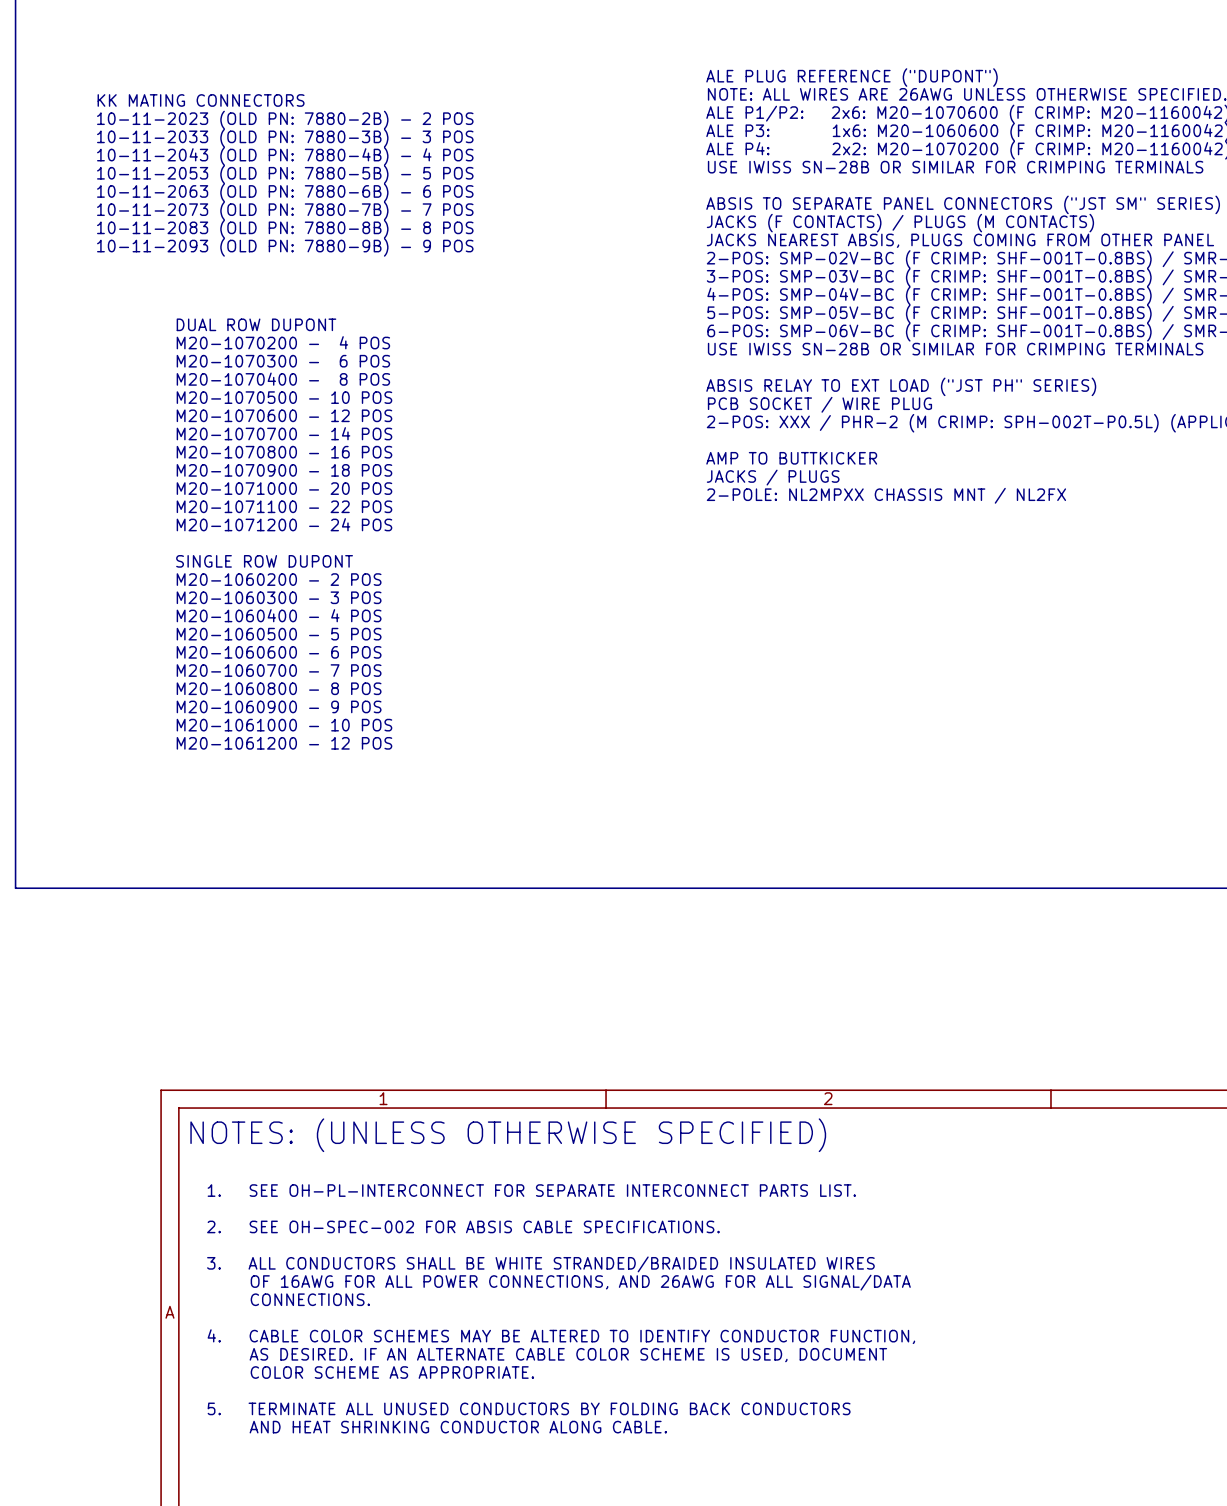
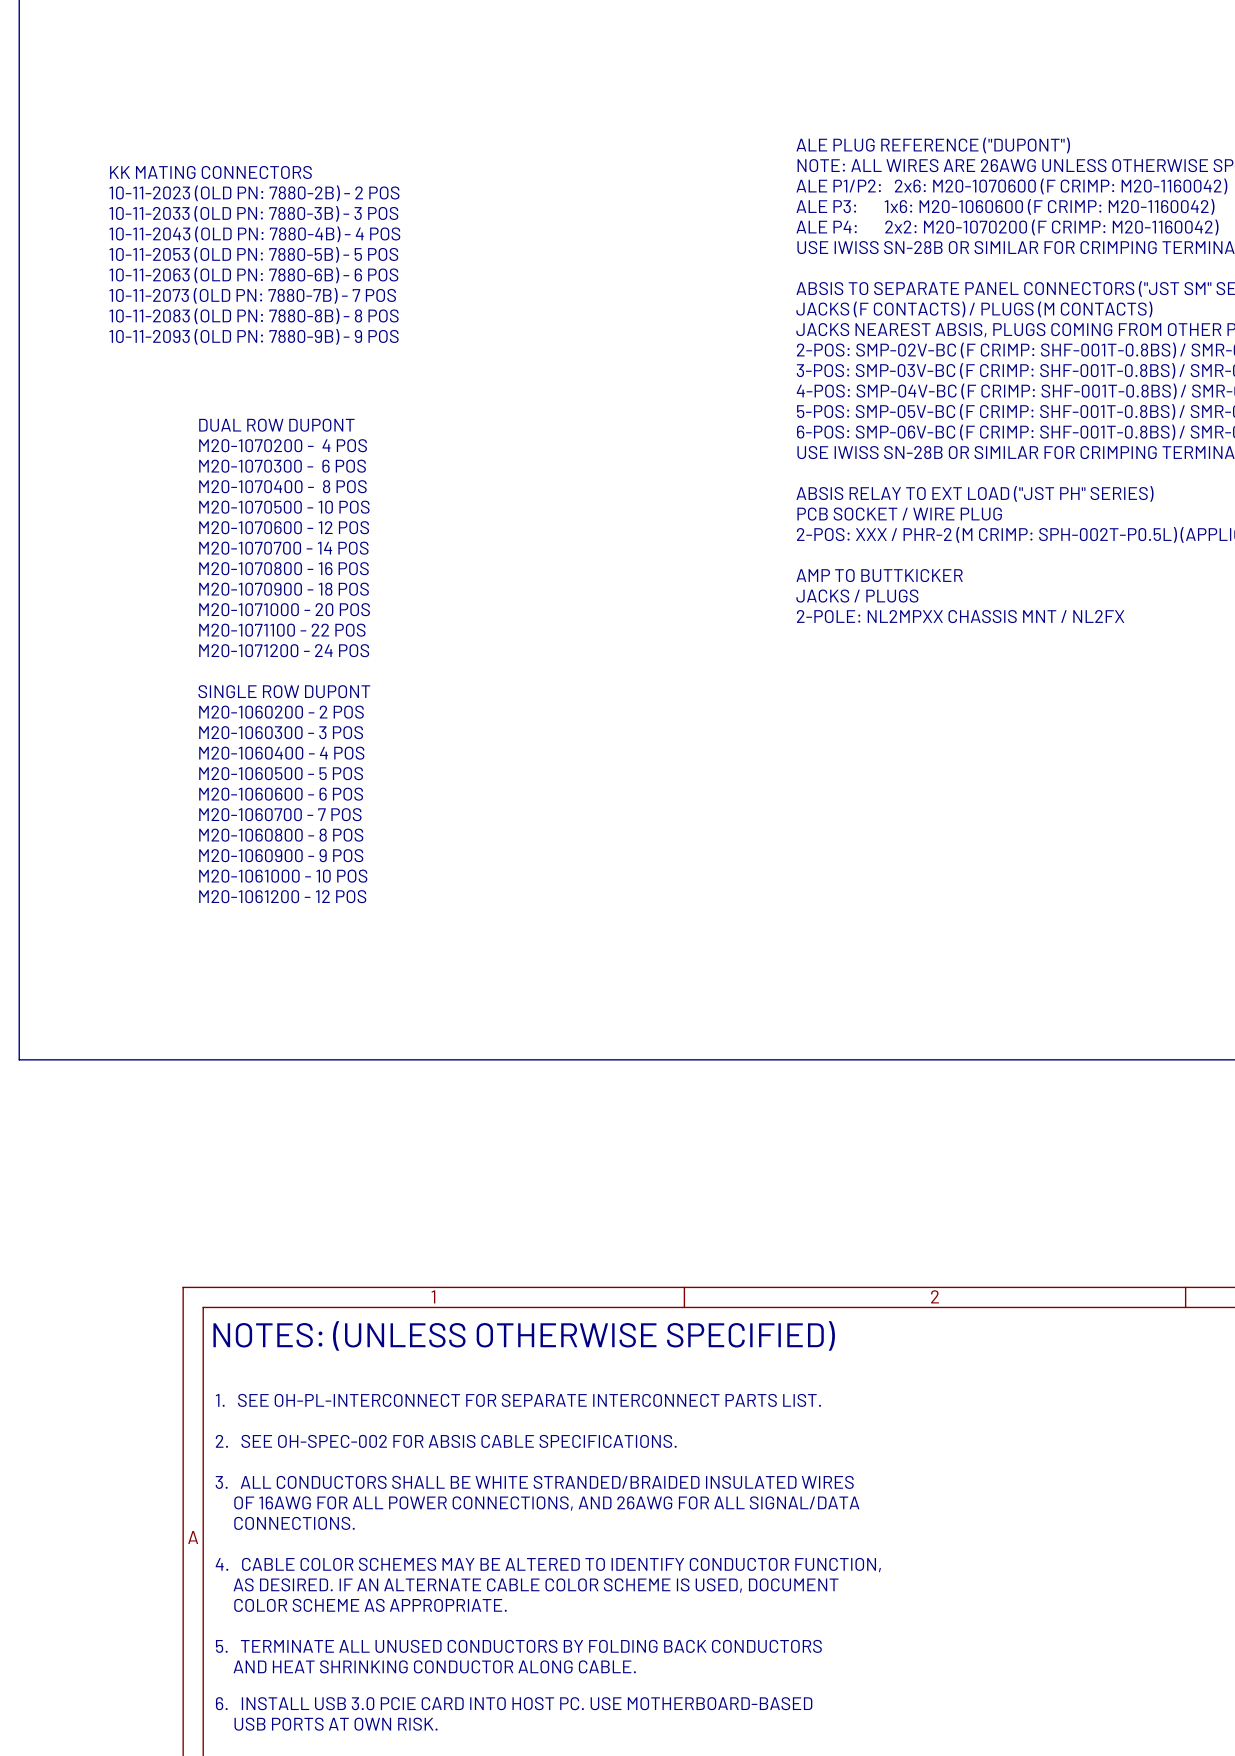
text: none -> 6. INSTALL USB 3.0 PCIE CARD INTO HOST PC. USE MOTHERBOARD-BASED (514, 1703)
text: none -> USB PORTS AT OWN RISK. (336, 1724)

